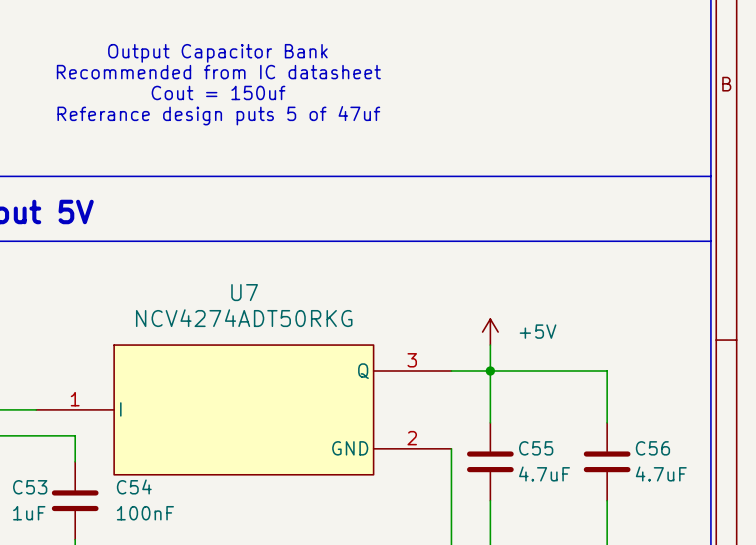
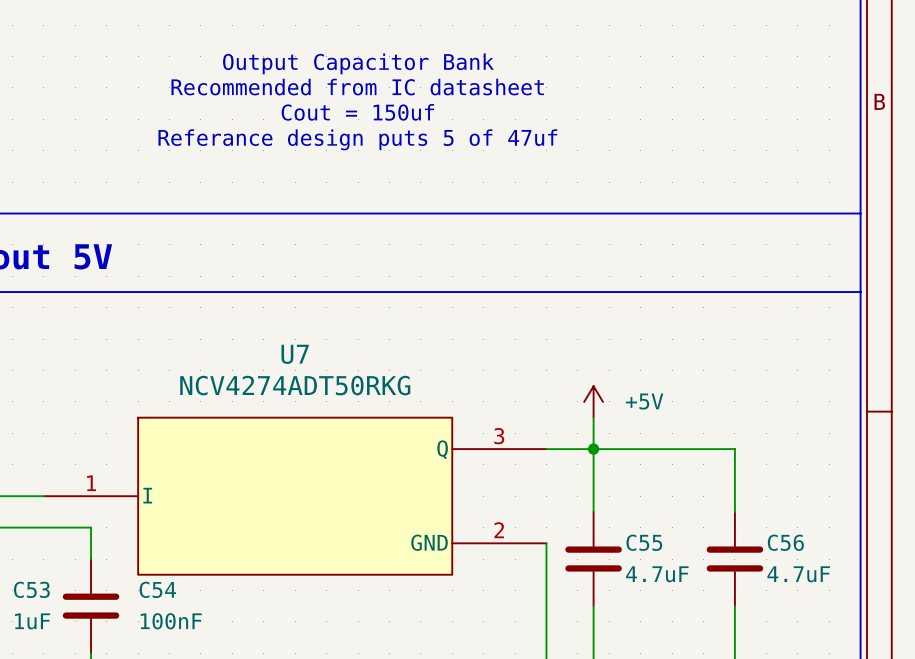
text position: Output Capacitor Bank (217, 53) -> Output Capacitor Bank (358, 63)
text position: Recommended from IC datasheet (218, 72) -> Recommended from IC datasheet (357, 87)
text position: Cout = 150uf (218, 92) -> Cout = 150uf (357, 112)
text position: Referance design puts 5 of 47uf (218, 115) -> Referance design puts 5 of 47uf (357, 139)

